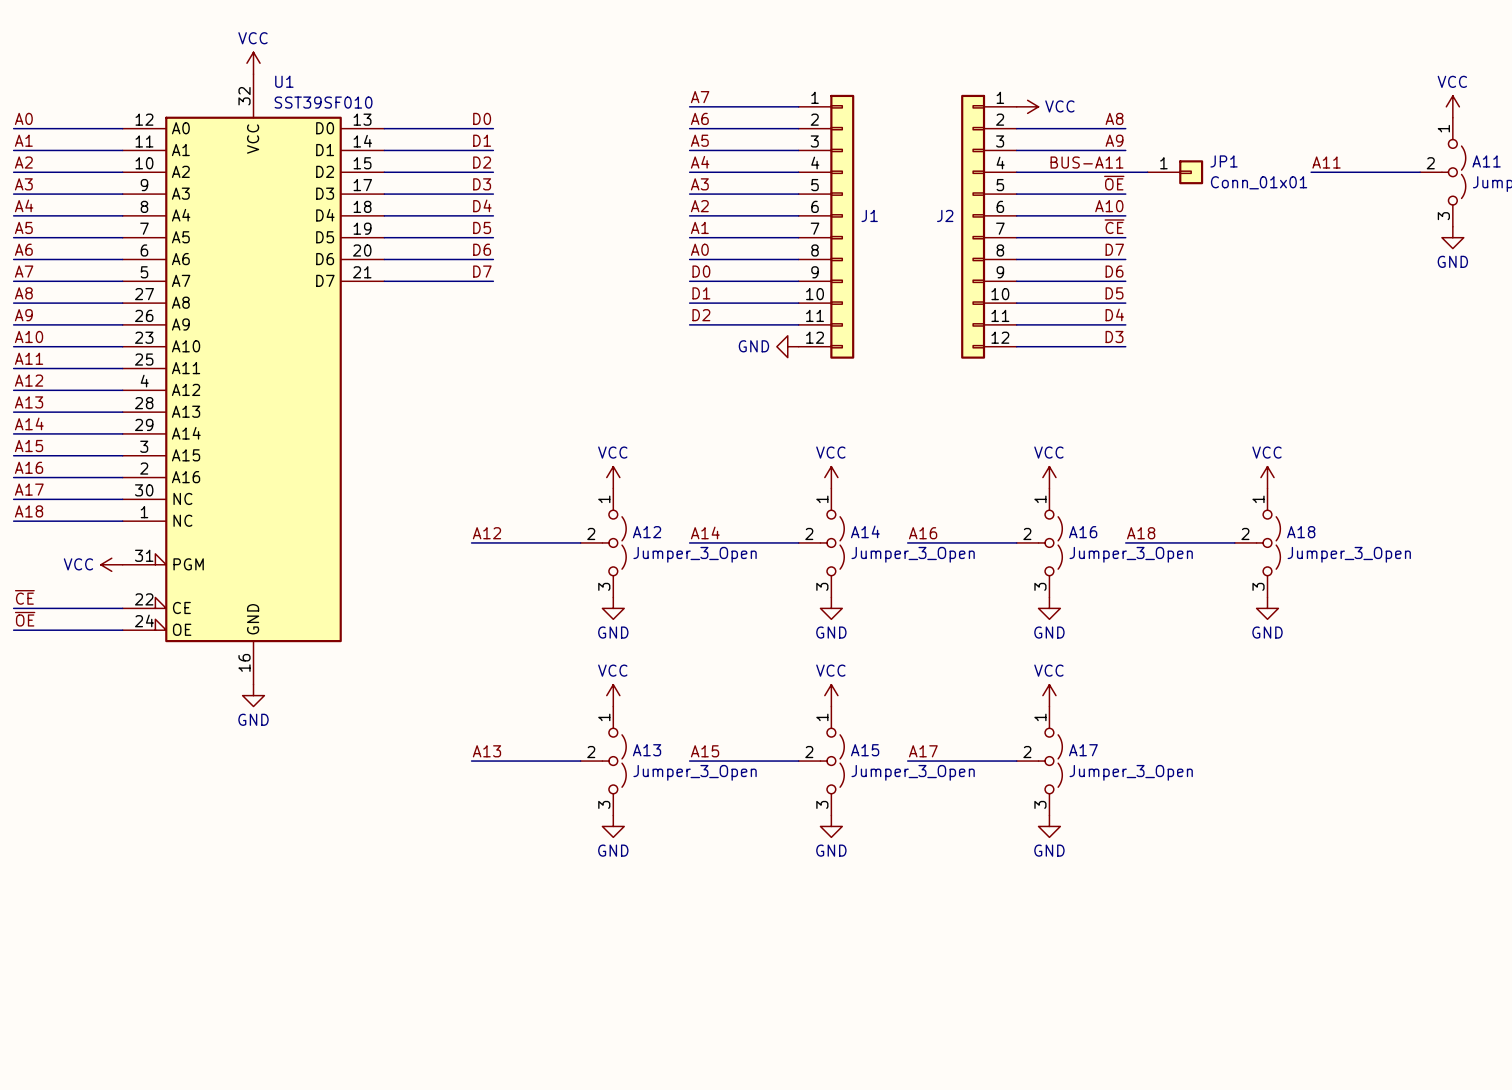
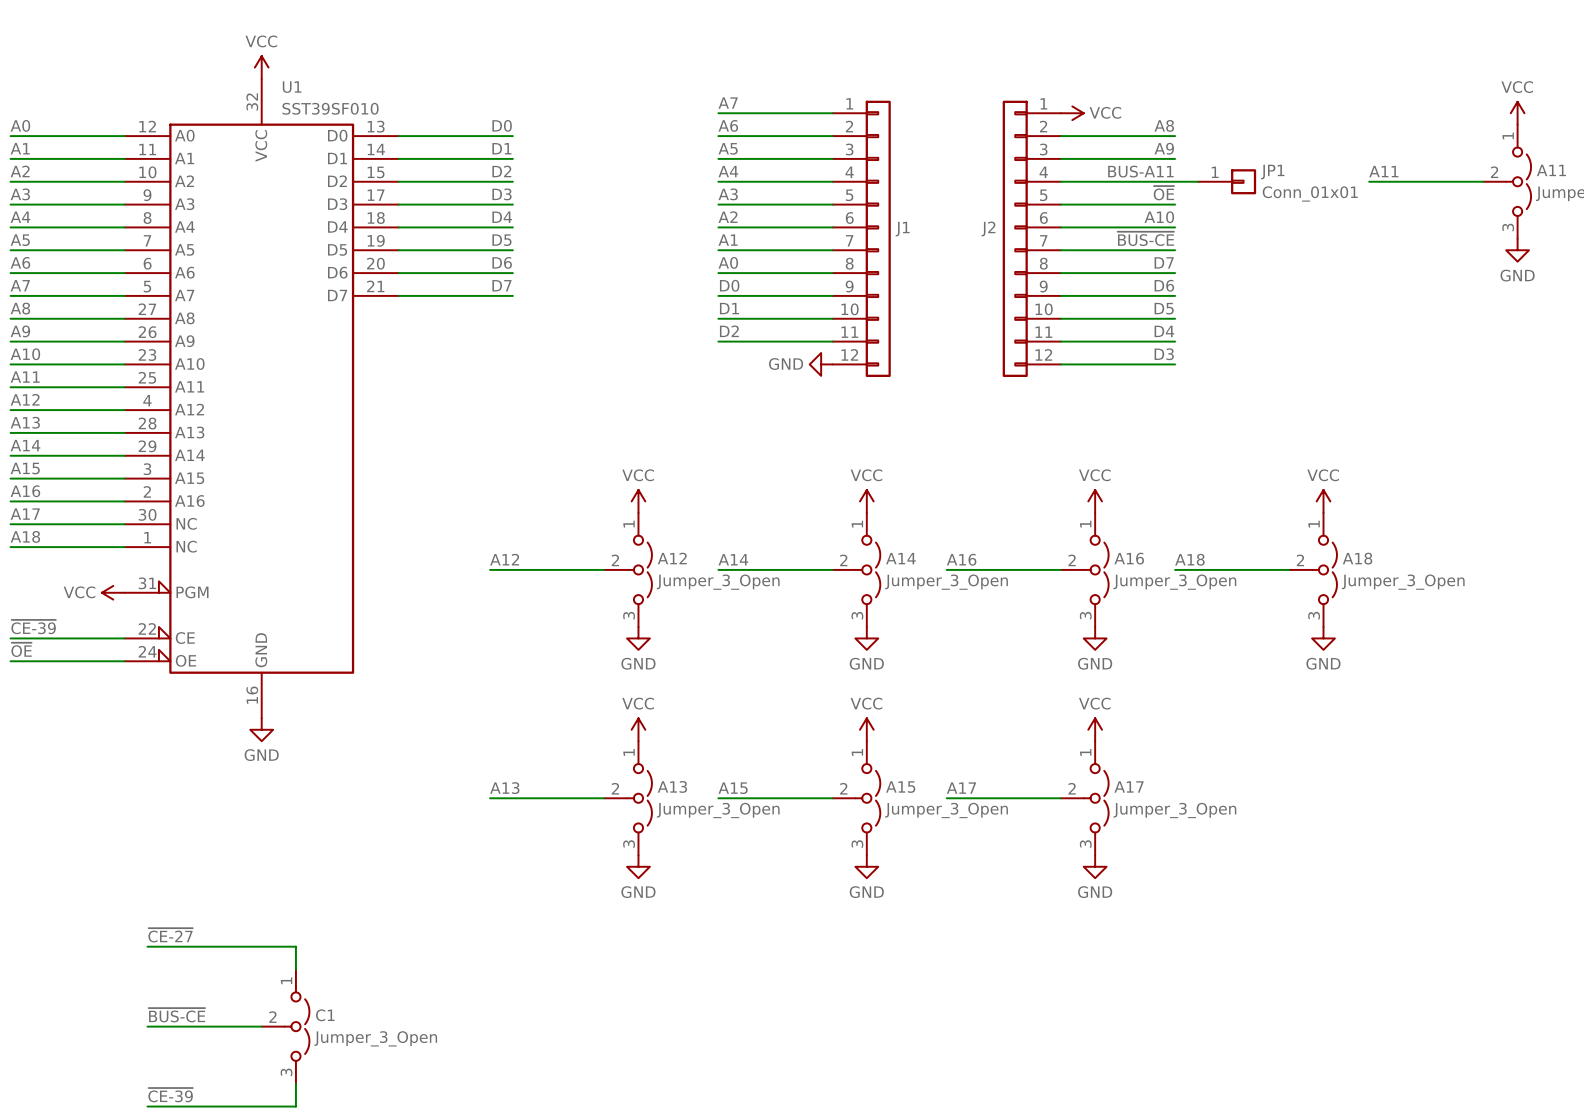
label: ~{CE} (1114, 226) -> ~{BUS-CE} (1145, 238)
label: ~{CE} (24, 597) -> ~{CE-39} (33, 627)
label: none -> ~{CE-27} (170, 935)
wire: none -> (147, 946) (295, 946) (295, 969)
label: none -> ~{BUS-CE} (176, 1015)
wire: none -> (147, 1026) (261, 1026)
C1: none -> Jumper_3_Open (285, 1026)
wire: none -> (295, 1083) (295, 1106) (147, 1106)
label: none -> ~{CE-39} (170, 1095)

